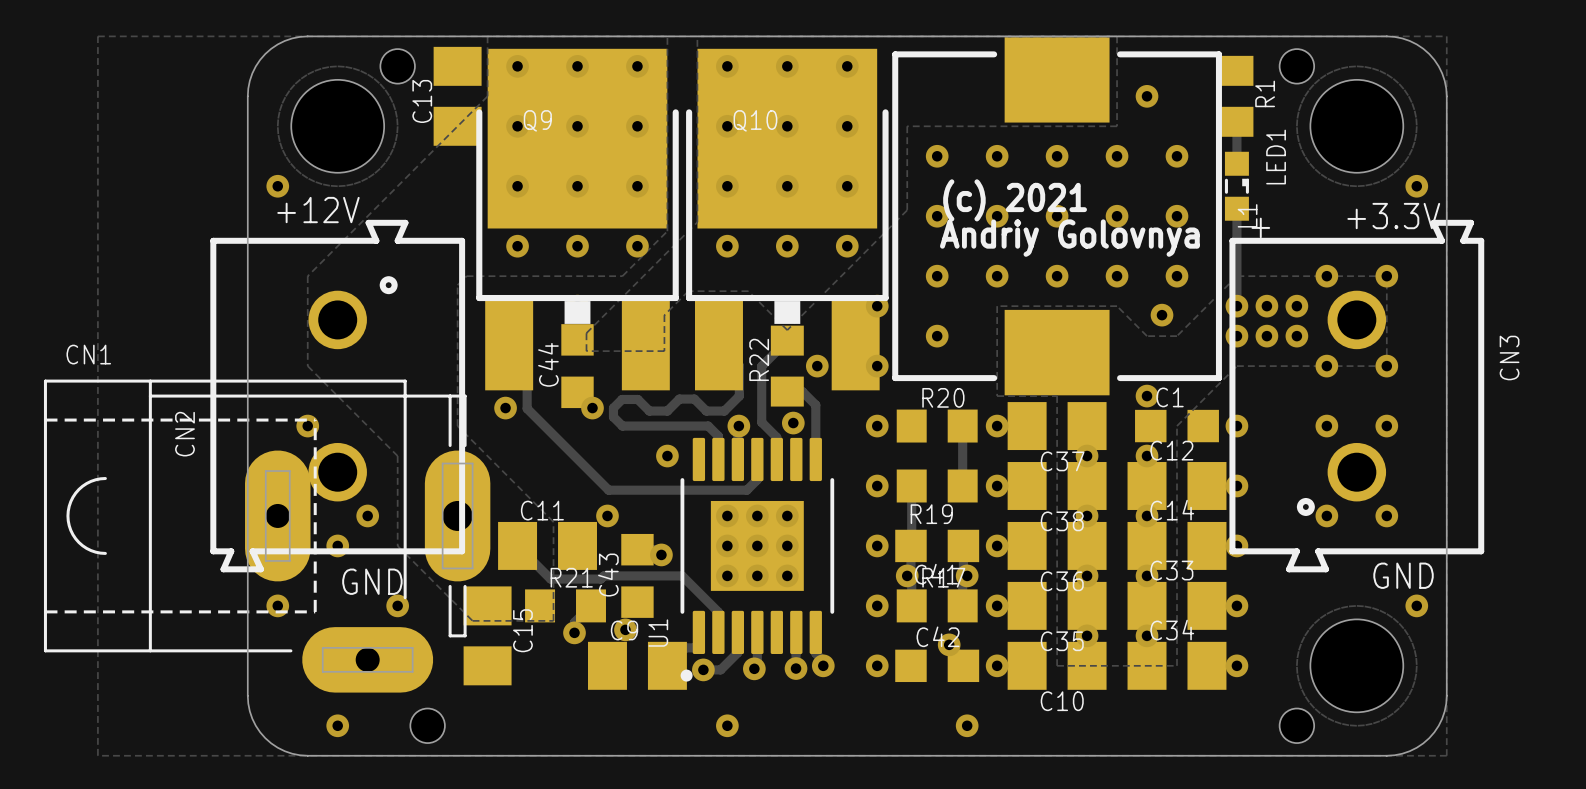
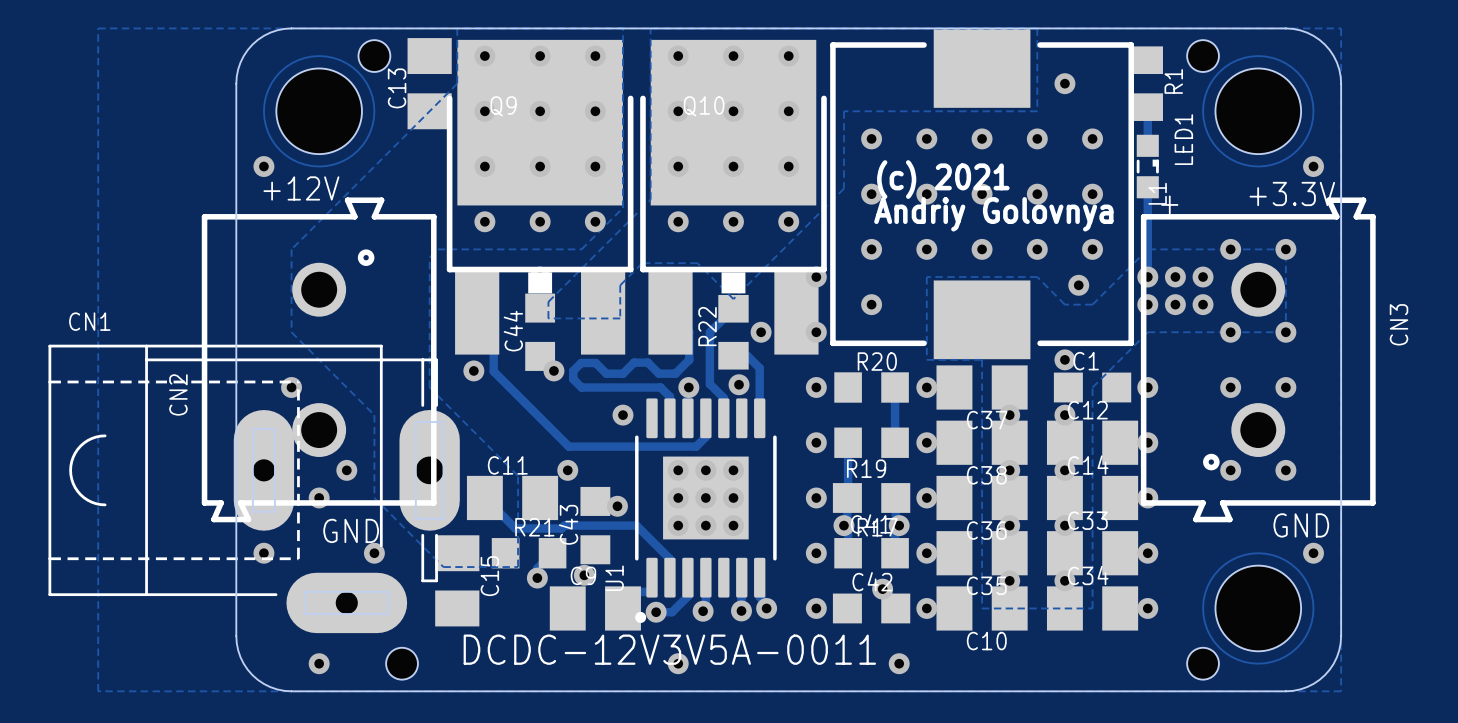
text: none -> DCDC-12V3V5A-0011 (669, 649)

